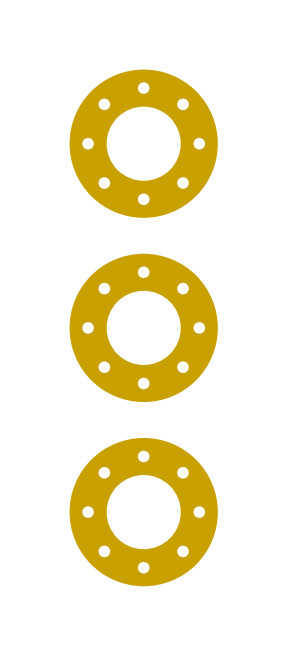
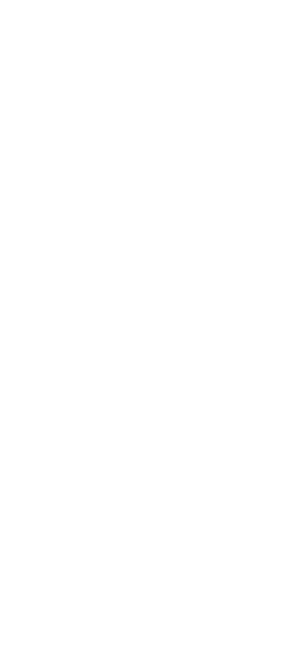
part: (143, 143) -> none
part: (143, 327) -> none
part: (143, 512) -> none

